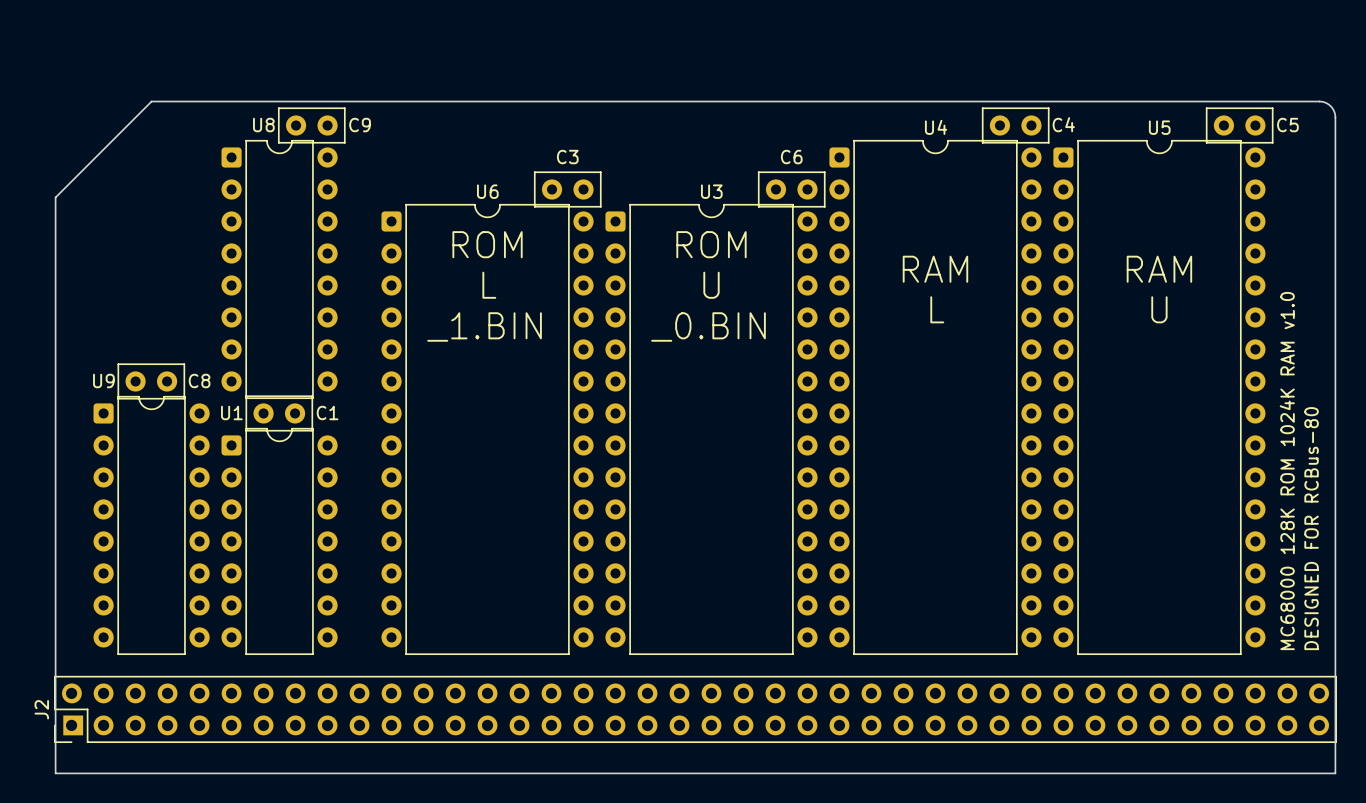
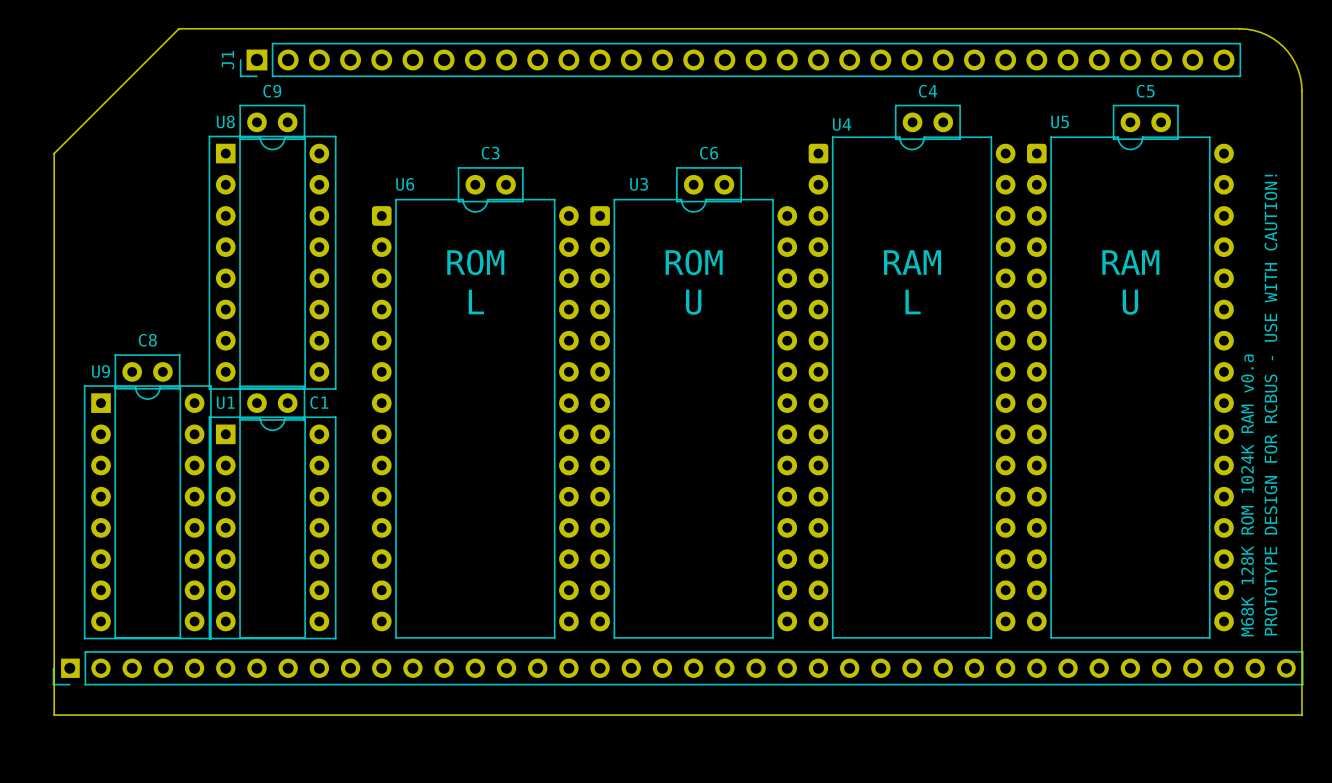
J1: none -> (740, 59)
C4 name position: C4 (1063, 124) -> C4 (928, 91)
U8 name position: U8 (263, 125) -> U8 (225, 121)
C9 position: (311, 125) -> (272, 122)
C9 name position: C9 (360, 125) -> C9 (272, 91)
C4 position: (1015, 125) -> (927, 122)
C5 position: (1239, 125) -> (1145, 122)
C5 name position: C5 (1287, 125) -> C5 (1145, 91)
U4 name position: U4 (936, 127) -> U4 (842, 124)
U5 name position: U5 (1159, 127) -> U5 (1060, 122)
U8 footprint: [221, 139, 338, 399] -> [208, 135, 337, 390]
C3 position: (567, 189) -> (490, 184)
C6 position: (791, 189) -> (709, 184)
U6 name position: U6 (487, 191) -> U6 (405, 184)
U3 name position: U3 (711, 191) -> U3 (639, 184)
text position: ROM (487, 244) -> ROM (475, 262)
text position: ROM (711, 244) -> ROM (694, 262)
text position: L (489, 285) -> L (476, 302)
text position: U (711, 285) -> U (693, 302)
text: _1.BIN (484, 326) -> none
text: _0.BIN (708, 326) -> none
C8 name position: C8 (199, 380) -> C8 (147, 340)
part: none -> (678, 371)
text: none -> PROTOTYPE DESIGN FOR RCBUS - USE WITH CAUTION! (1270, 405)
U9 footprint: [93, 395, 210, 655] -> [83, 385, 212, 640]
U1 footprint: [221, 427, 338, 655] -> [208, 416, 337, 640]
J2: (695, 437) -> none
text: MC68000 128K ROM 1024K RAM v1.0 (1287, 471) -> M68K 128K ROM 1024K RAM v0.a (1247, 495)
text: DESIGNED FOR RCBus-80 (1311, 528) -> none

